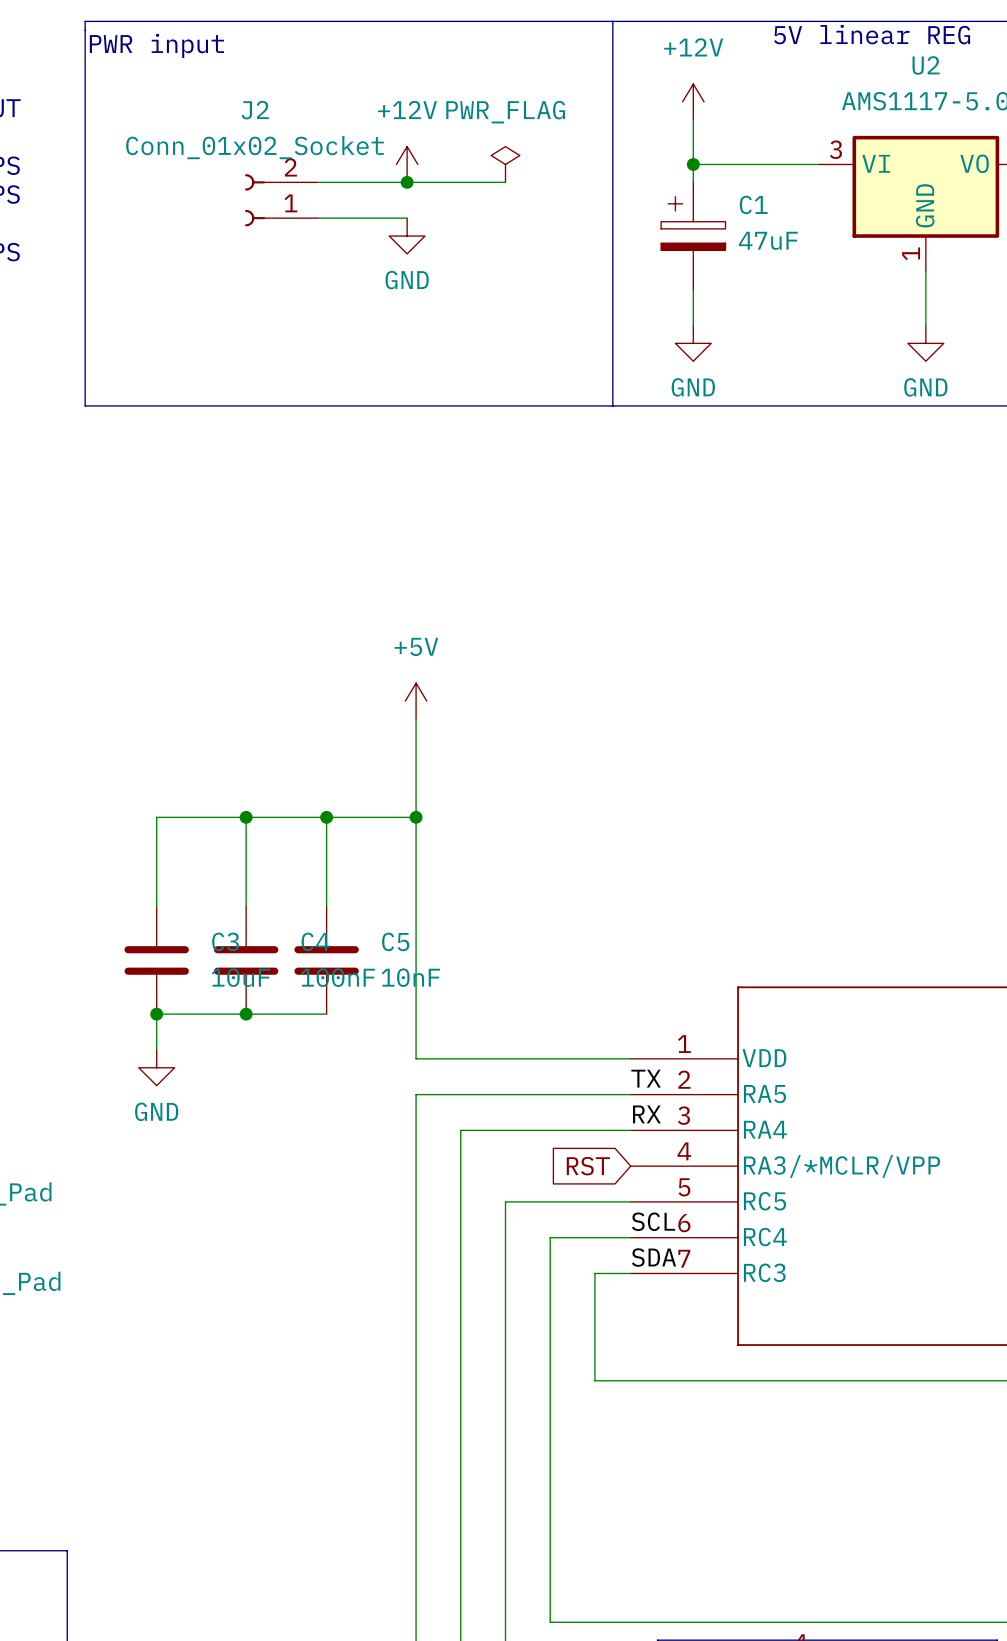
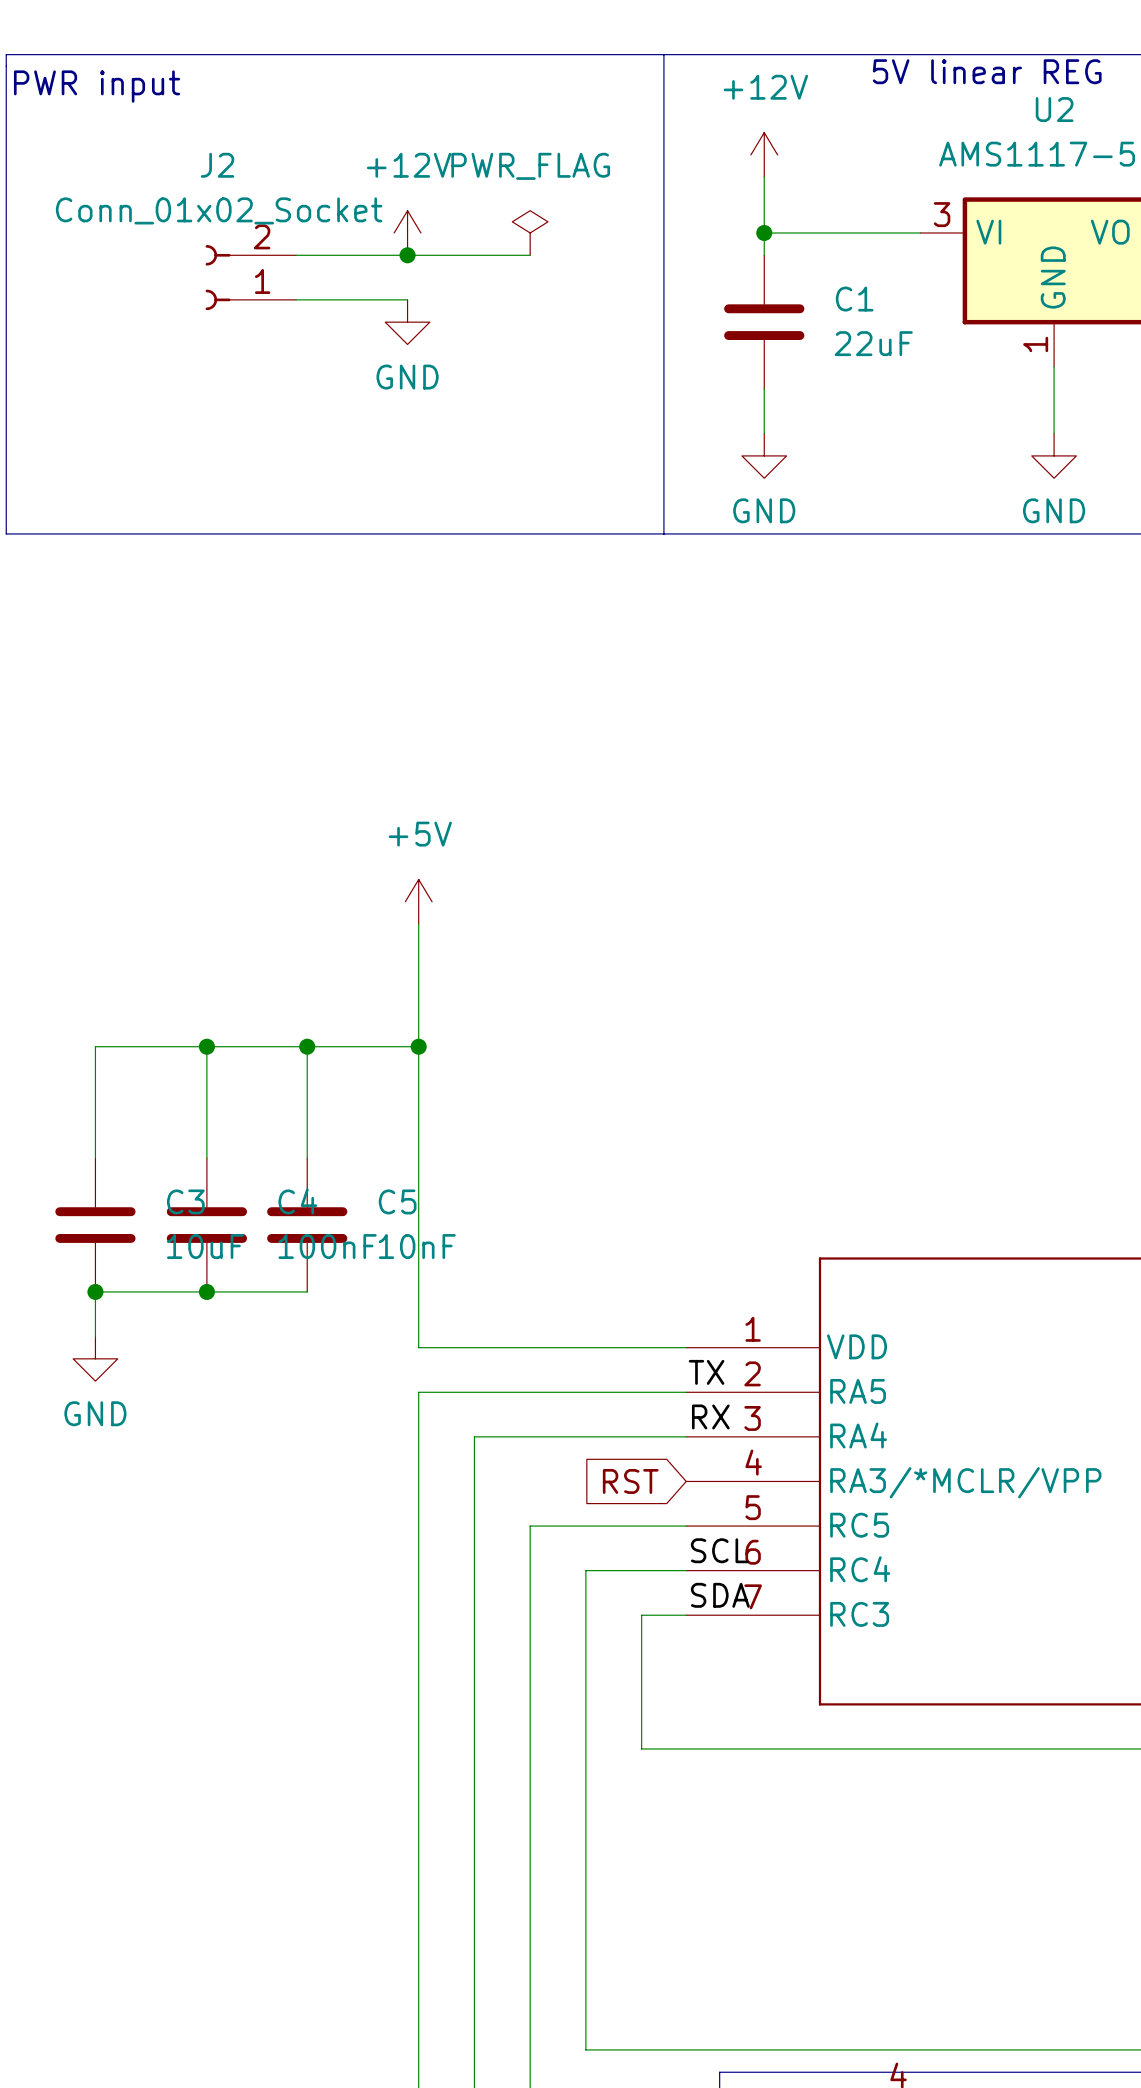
C1 symbol: [661, 182, 726, 290] -> [724, 255, 805, 390]
C1 value: 47uF (768, 240) -> 22uF (873, 343)

